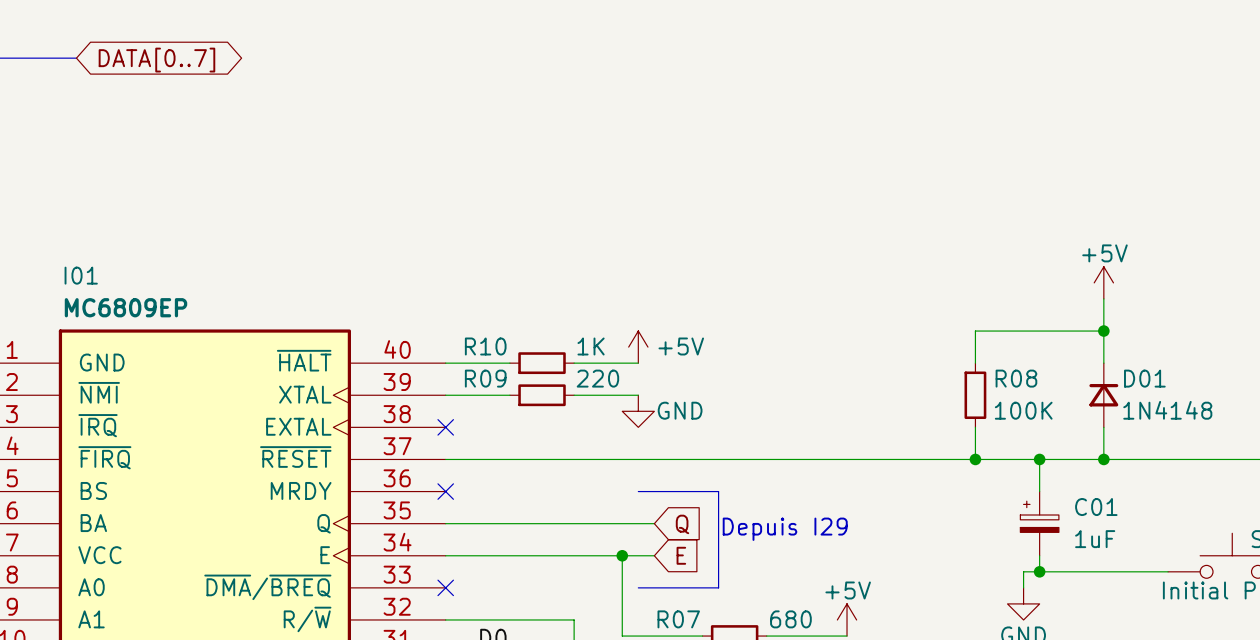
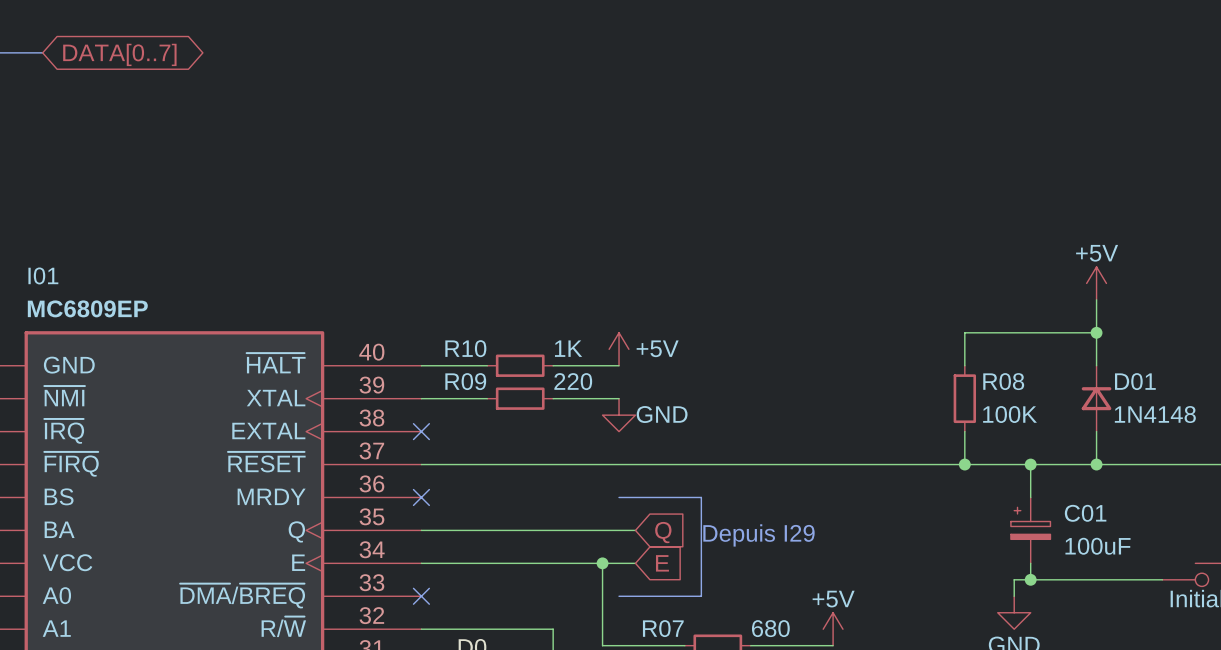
C01 value: 1uF (1095, 539) -> 100uF (1097, 546)

